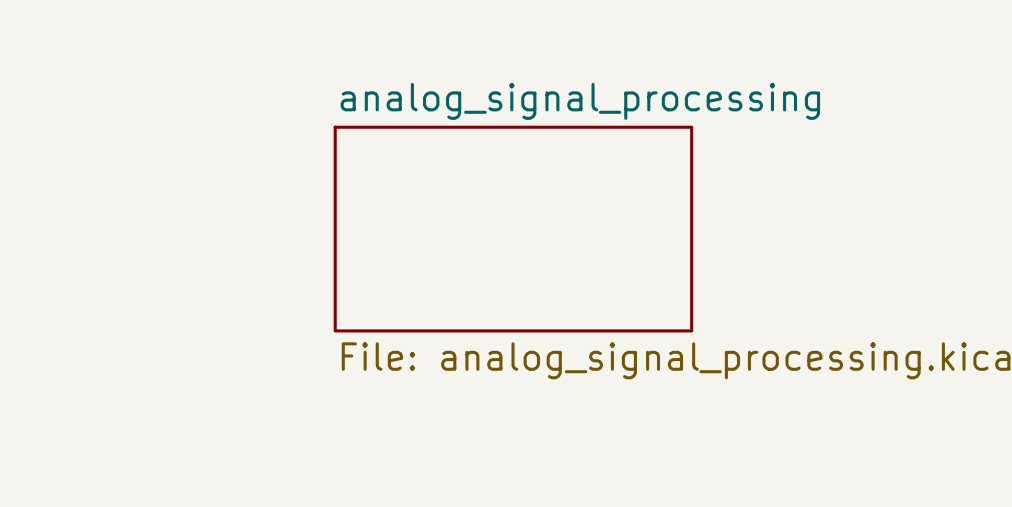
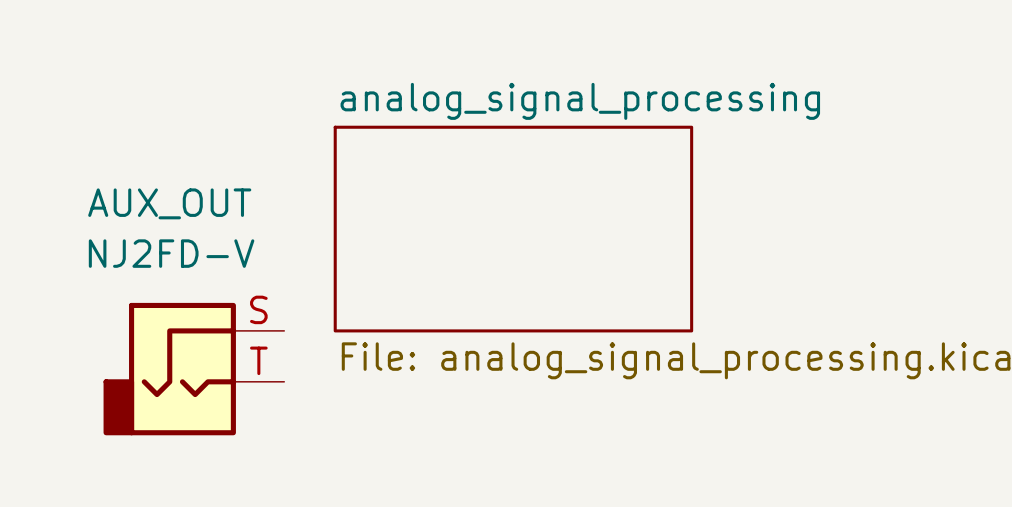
AUX_OUT: none -> NJ2FD-V (193, 369)

